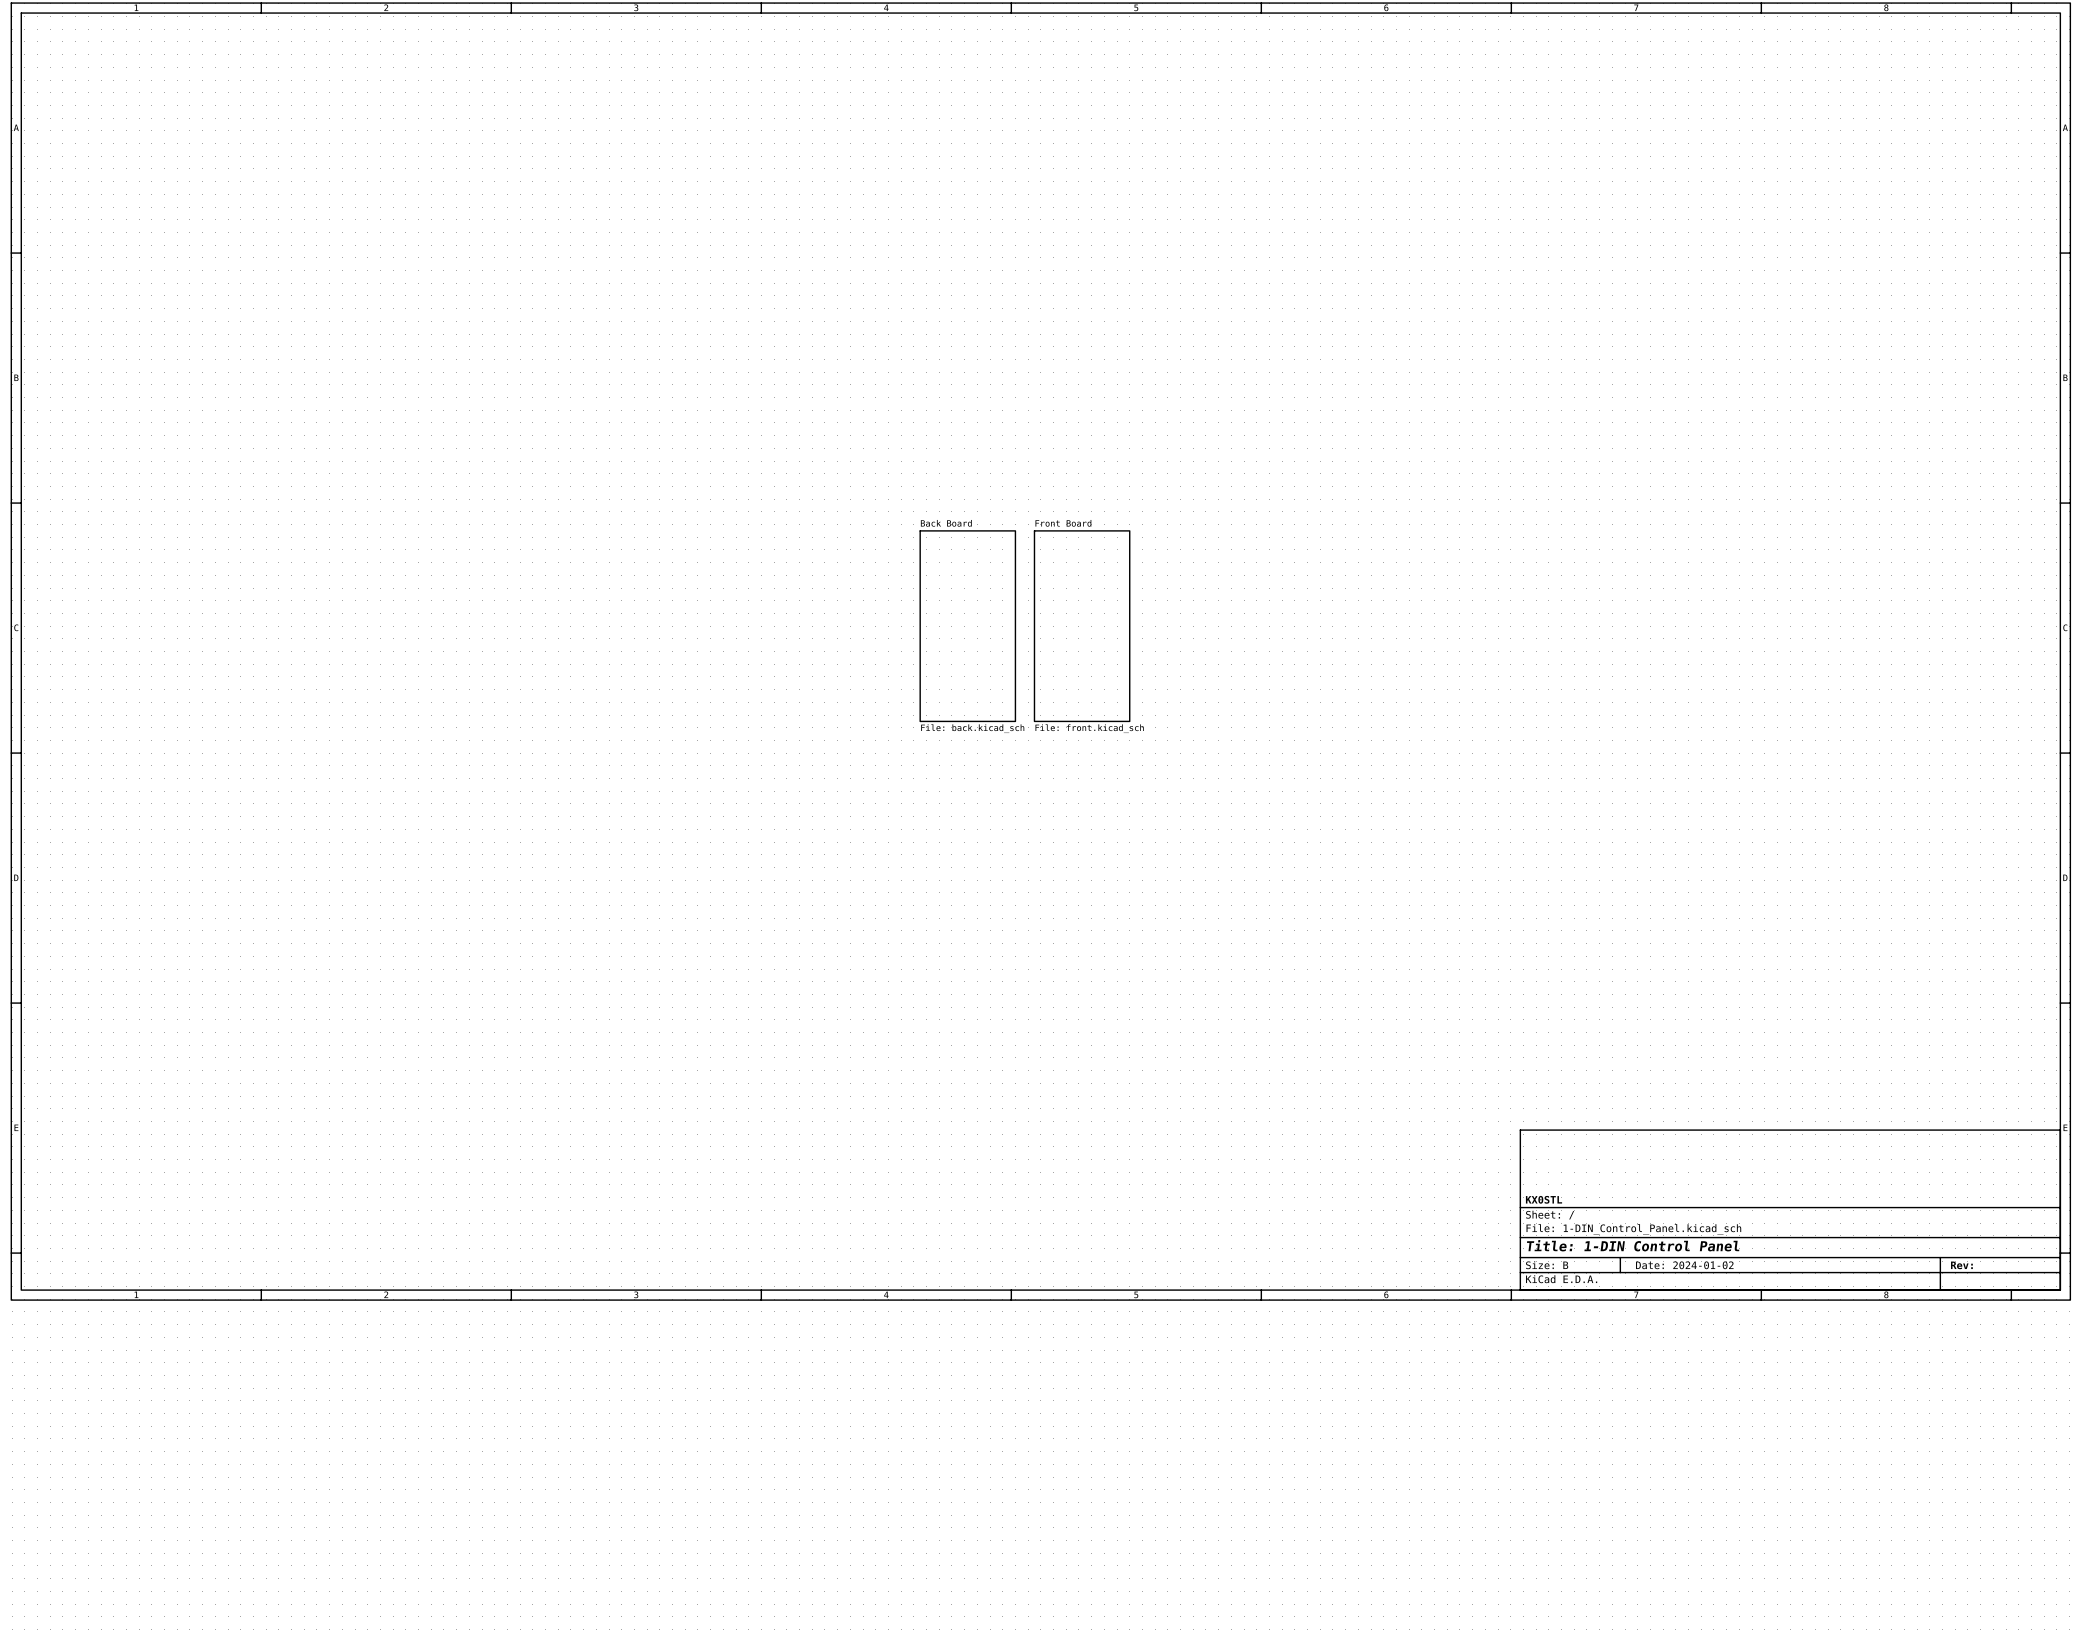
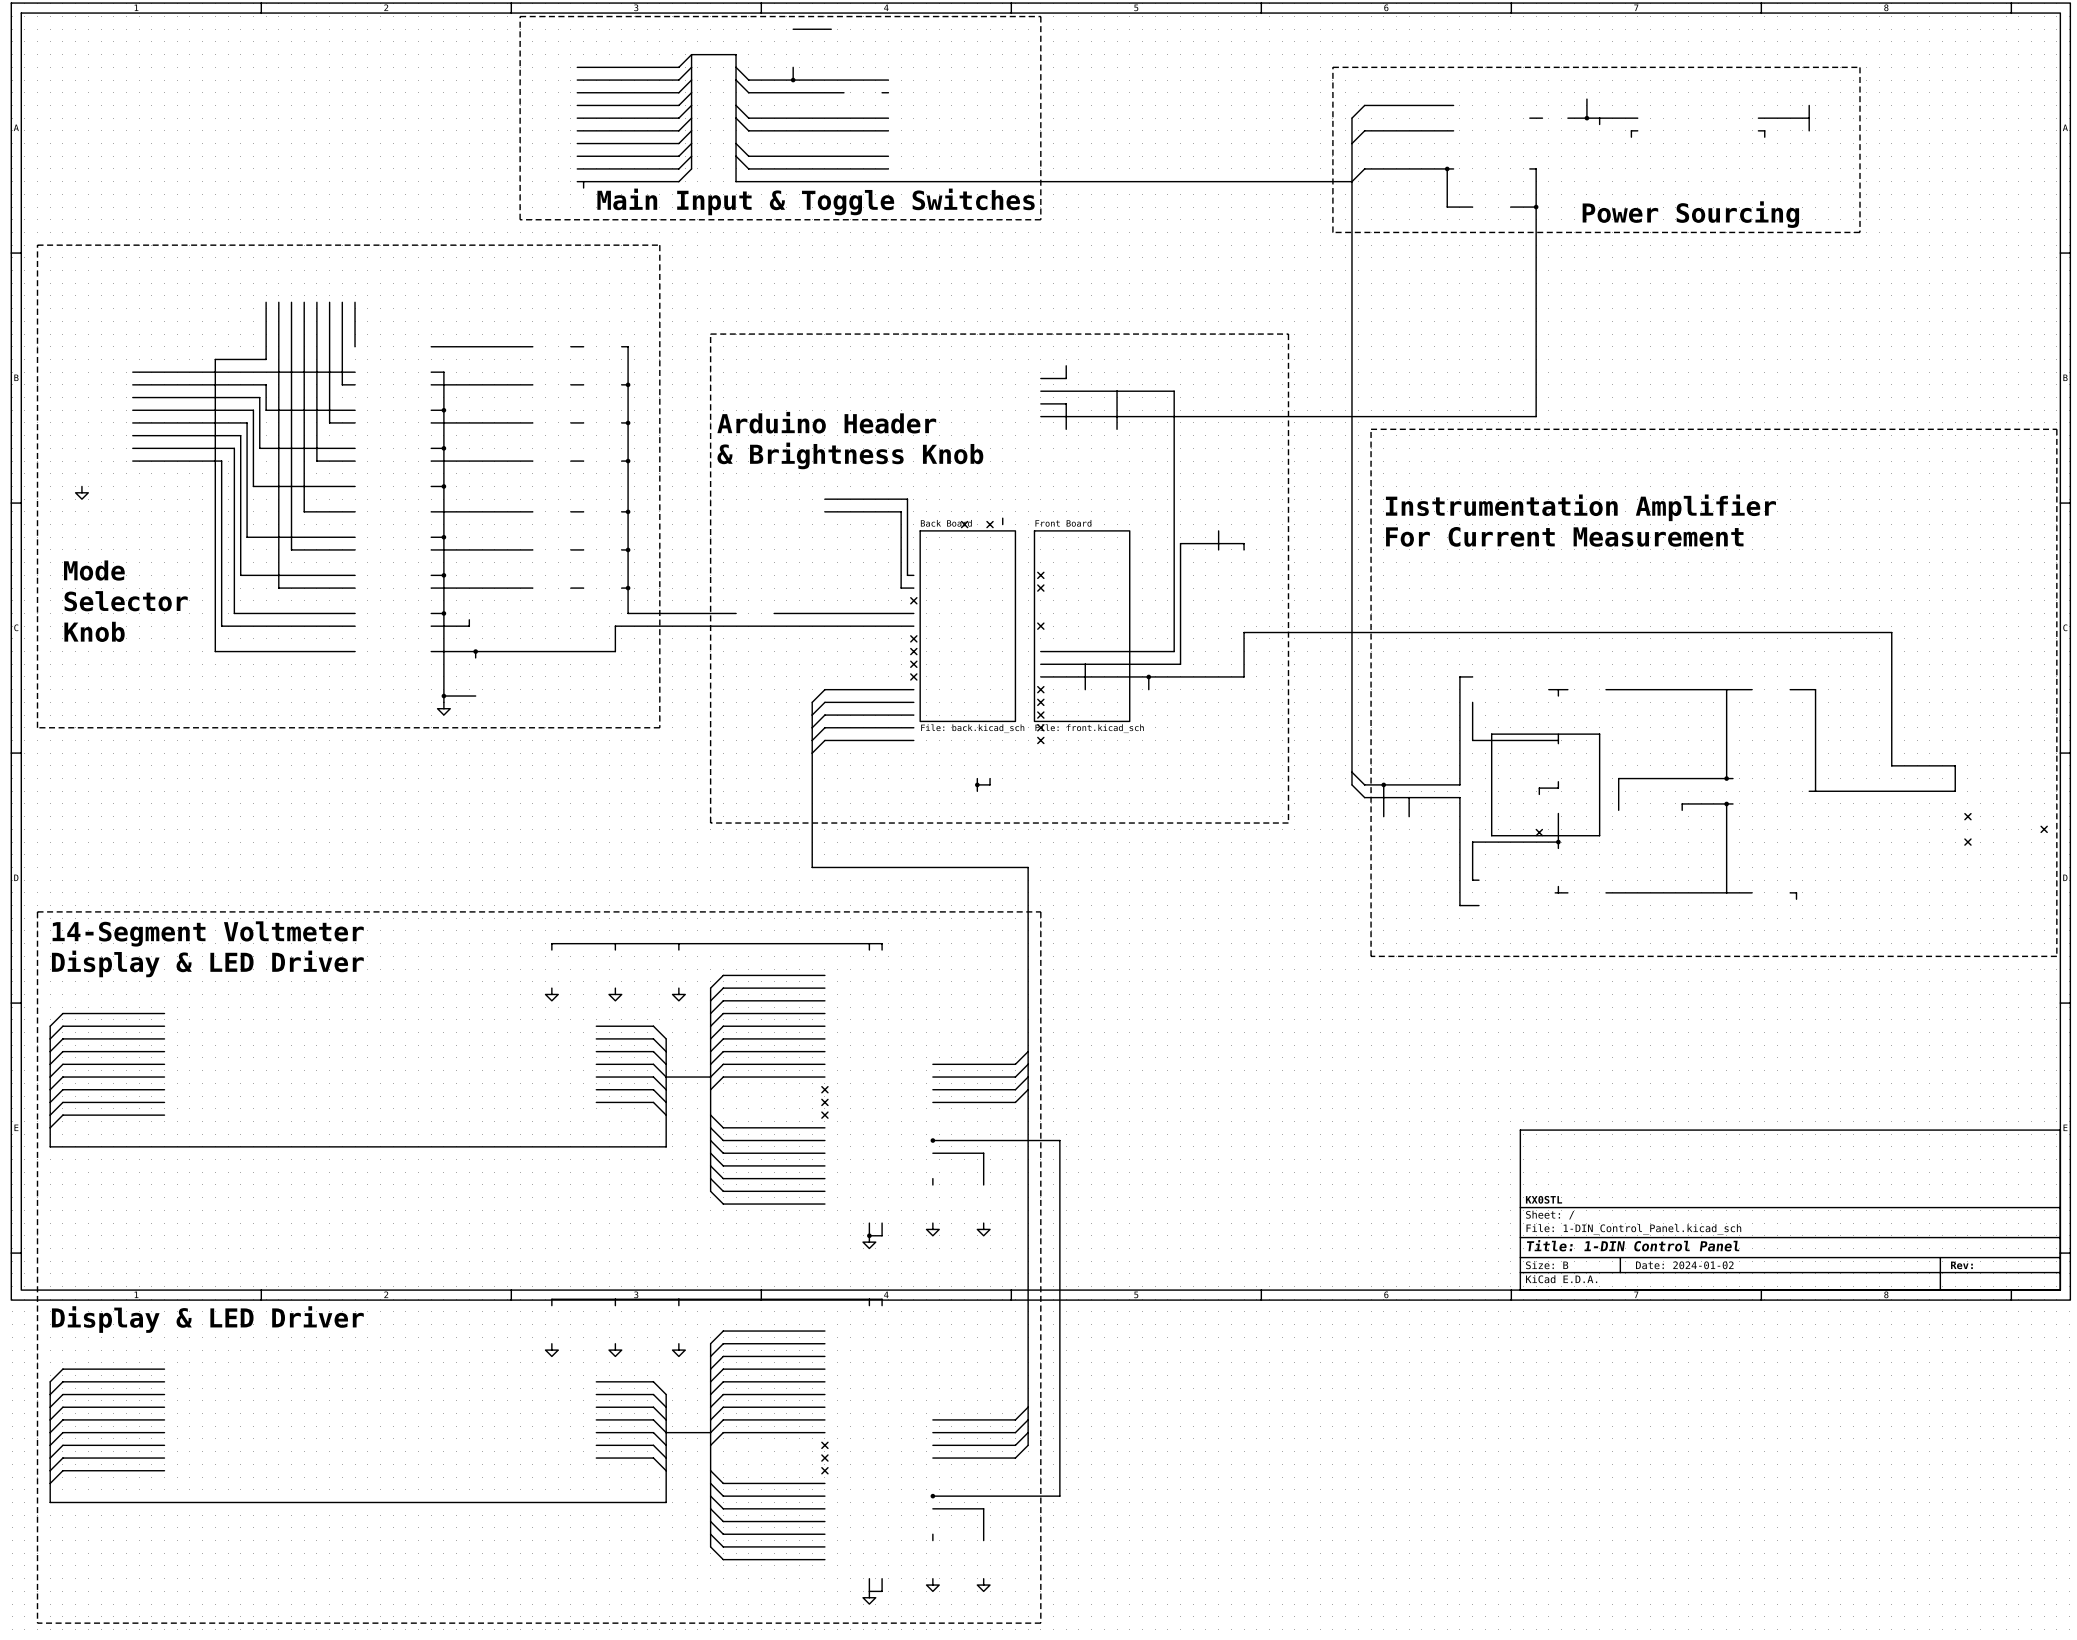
line: none -> (520, 16) (1040, 16) (1040, 219) (520, 219) (520, 16)
wire: none -> (793, 29) (831, 29)
wire: none -> (691, 54) (678, 67) (577, 67)
wire: none -> (691, 67) (678, 80) (577, 80)
wire: none -> (736, 67) (748, 80) (888, 80)
wire: none -> (793, 67) (793, 80)
line: none -> (1332, 67) (1860, 67) (1860, 232) (1332, 232) (1332, 67)
wire: none -> (691, 80) (678, 92) (577, 92)
wire: none -> (736, 80) (748, 92) (843, 92)
junction: none -> (793, 80)
wire: none -> (691, 92) (678, 105) (577, 105)
wire: none -> (882, 92) (888, 92)
wire: none -> (1586, 99) (1586, 118)
wire: none -> (691, 105) (678, 118) (577, 118)
wire: none -> (736, 105) (748, 118) (888, 118)
wire: none -> (1453, 105) (1364, 105) (1351, 118)
wire: none -> (1809, 105) (1809, 130)
wire: none -> (691, 118) (678, 130) (577, 130)
wire: none -> (736, 118) (748, 130) (888, 130)
bus: none -> (1351, 118) (1351, 784)
wire: none -> (1529, 118) (1542, 118)
wire: none -> (1567, 118) (1637, 118)
junction: none -> (1586, 118)
wire: none -> (1599, 118) (1599, 124)
wire: none -> (1758, 118) (1809, 118)
wire: none -> (691, 130) (678, 143) (577, 143)
wire: none -> (1453, 130) (1364, 130) (1351, 143)
wire: none -> (1637, 130) (1631, 130) (1631, 137)
wire: none -> (1758, 130) (1764, 130) (1764, 137)
wire: none -> (691, 143) (678, 156) (577, 156)
wire: none -> (736, 143) (748, 156) (888, 156)
wire: none -> (691, 156) (678, 168) (577, 168)
wire: none -> (736, 156) (748, 168) (888, 168)
wire: none -> (691, 168) (678, 181) (577, 181)
bus: none -> (691, 168) (691, 54) (736, 54) (736, 181) (1351, 181)
wire: none -> (1447, 168) (1447, 207) (1472, 207)
junction: none -> (1447, 168)
wire: none -> (1453, 168) (1364, 168) (1351, 181)
wire: none -> (1529, 168) (1536, 168) (1536, 416) (1040, 416)
wire: none -> (583, 181) (583, 188)
text: none -> Main Input & Toggle Switches (816, 201)
wire: none -> (1510, 207) (1536, 207)
junction: none -> (1536, 207)
text: none -> Power Sourcing (1690, 214)
line: none -> (37, 245) (659, 245) (659, 727) (37, 727) (37, 245)
wire: none -> (266, 302) (266, 359) (215, 359) (215, 651) (355, 651)
wire: none -> (278, 302) (278, 588) (355, 588)
wire: none -> (291, 302) (291, 549) (355, 549)
wire: none -> (304, 302) (304, 511) (355, 511)
wire: none -> (316, 302) (316, 461) (355, 461)
wire: none -> (329, 302) (329, 422) (355, 422)
wire: none -> (342, 302) (342, 384) (355, 384)
wire: none -> (355, 302) (355, 346)
line: none -> (710, 334) (1288, 334) (1288, 823) (710, 823) (710, 334)
wire: none -> (431, 346) (532, 346)
wire: none -> (570, 346) (583, 346)
wire: none -> (621, 346) (628, 346) (628, 613) (736, 613)
wire: none -> (1066, 365) (1066, 378) (1040, 378)
wire: none -> (132, 372) (355, 372)
wire: none -> (431, 372) (443, 372) (443, 702)
wire: none -> (132, 384) (266, 384) (266, 410) (355, 410)
wire: none -> (431, 384) (532, 384)
wire: none -> (570, 384) (583, 384)
wire: none -> (621, 384) (628, 384)
junction: none -> (628, 384)
wire: none -> (1040, 391) (1174, 391) (1174, 651) (1040, 651)
wire: none -> (1117, 391) (1117, 429)
wire: none -> (132, 397) (259, 397) (259, 448) (355, 448)
wire: none -> (1040, 403) (1066, 403) (1066, 429)
wire: none -> (132, 410) (253, 410) (253, 486) (355, 486)
wire: none -> (431, 410) (443, 410)
junction: none -> (443, 410)
wire: none -> (132, 422) (247, 422) (247, 537) (355, 537)
wire: none -> (431, 422) (532, 422)
wire: none -> (570, 422) (583, 422)
wire: none -> (621, 422) (628, 422)
junction: none -> (628, 422)
text: none -> Arduino Header (826, 422)
line: none -> (1371, 429) (2056, 429) (2056, 956) (1371, 956) (1371, 429)
wire: none -> (132, 435) (240, 435) (240, 575) (355, 575)
wire: none -> (132, 448) (234, 448) (234, 613) (355, 613)
wire: none -> (431, 448) (443, 448)
junction: none -> (443, 448)
text: none -> & Brightness Knob (850, 455)
wire: none -> (132, 461) (221, 461) (221, 626) (355, 626)
wire: none -> (431, 461) (532, 461)
wire: none -> (570, 461) (583, 461)
wire: none -> (621, 461) (628, 461)
junction: none -> (628, 461)
wire: none -> (431, 486) (443, 486)
junction: none -> (443, 486)
power symbol: none -> (81, 492)
wire: none -> (824, 499) (907, 499) (907, 575) (913, 575)
text: none -> Instrumentation Amplifier (1580, 507)
wire: none -> (431, 511) (532, 511)
wire: none -> (570, 511) (583, 511)
wire: none -> (621, 511) (628, 511)
junction: none -> (628, 511)
wire: none -> (824, 511) (901, 511) (901, 588) (913, 588)
wire: none -> (1002, 518) (1002, 524)
no-connect mark: none -> (964, 524)
no-connect mark: none -> (990, 524)
wire: none -> (1218, 530) (1218, 549)
text: none -> For Current Measurement (1564, 536)
wire: none -> (431, 537) (443, 537)
junction: none -> (443, 537)
wire: none -> (431, 549) (532, 549)
wire: none -> (570, 549) (583, 549)
wire: none -> (621, 549) (628, 549)
junction: none -> (628, 549)
wire: none -> (1244, 549) (1244, 543) (1180, 543) (1180, 664) (1040, 664)
text: none -> Mode (94, 570)
wire: none -> (431, 575) (443, 575)
junction: none -> (443, 575)
no-connect mark: none -> (1040, 575)
wire: none -> (431, 588) (532, 588)
wire: none -> (570, 588) (583, 588)
wire: none -> (621, 588) (628, 588)
junction: none -> (628, 588)
no-connect mark: none -> (1040, 588)
no-connect mark: none -> (913, 600)
text: none -> Selector (126, 601)
wire: none -> (431, 613) (443, 613)
junction: none -> (443, 613)
wire: none -> (774, 613) (913, 613)
wire: none -> (469, 619) (469, 626) (431, 626)
wire: none -> (913, 626) (615, 626) (615, 651) (431, 651)
no-connect mark: none -> (1040, 626)
text: none -> Knob (94, 631)
no-connect mark: none -> (913, 638)
wire: none -> (475, 651) (475, 657)
junction: none -> (475, 651)
no-connect mark: none -> (913, 651)
no-connect mark: none -> (913, 664)
wire: none -> (1085, 664) (1085, 689)
no-connect mark: none -> (913, 676)
wire: none -> (1040, 676) (1244, 676) (1244, 632) (1891, 632) (1891, 765) (1955, 765) (1955, 791) (1809, 791)
wire: none -> (1148, 676) (1148, 689)
junction: none -> (1148, 676)
wire: none -> (1472, 676) (1459, 676) (1459, 784) (1364, 784) (1351, 772)
wire: none -> (913, 689) (824, 689) (812, 702)
no-connect mark: none -> (1040, 689)
wire: none -> (1548, 689) (1567, 689)
wire: none -> (1558, 689) (1558, 696)
wire: none -> (1605, 689) (1752, 689)
wire: none -> (1726, 689) (1726, 778)
wire: none -> (1790, 689) (1815, 689) (1815, 791)
wire: none -> (443, 696) (475, 696)
junction: none -> (443, 696)
bus: none -> (812, 702) (812, 867) (1028, 867) (1028, 1445)
wire: none -> (913, 702) (824, 702) (812, 715)
no-connect mark: none -> (1040, 702)
wire: none -> (1472, 702) (1472, 740) (1558, 740)
power symbol: none -> (443, 708)
wire: none -> (913, 715) (824, 715) (812, 727)
no-connect mark: none -> (1040, 715)
wire: none -> (913, 727) (824, 727) (812, 740)
no-connect mark: none -> (1040, 727)
line: none -> (1491, 734) (1599, 734) (1599, 835) (1491, 835) (1491, 734)
wire: none -> (1558, 734) (1558, 743)
wire: none -> (913, 740) (824, 740) (812, 753)
no-connect mark: none -> (1040, 740)
wire: none -> (977, 778) (977, 791)
wire: none -> (990, 778) (990, 784) (977, 784)
junction: none -> (1726, 778)
wire: none -> (1732, 778) (1618, 778) (1618, 810)
wire: none -> (1558, 781) (1558, 788) (1539, 788) (1539, 794)
junction: none -> (977, 784)
wire: none -> (1351, 784) (1364, 797) (1459, 797) (1459, 905) (1478, 905)
wire: none -> (1383, 784) (1383, 816)
junction: none -> (1383, 784)
wire: none -> (1409, 797) (1409, 816)
wire: none -> (1726, 803) (1726, 892)
junction: none -> (1726, 803)
wire: none -> (1732, 803) (1682, 803) (1682, 810)
wire: none -> (1558, 813) (1558, 848)
no-connect mark: none -> (1967, 816)
no-connect mark: none -> (2044, 829)
no-connect mark: none -> (1539, 832)
wire: none -> (1558, 842) (1472, 842) (1472, 880) (1478, 880)
junction: none -> (1558, 842)
no-connect mark: none -> (1967, 842)
wire: none -> (1558, 886) (1558, 892)
wire: none -> (1555, 892) (1567, 892)
wire: none -> (1605, 892) (1752, 892)
wire: none -> (1790, 892) (1796, 892) (1796, 899)
line: none -> (37, 911) (37, 1623) (1040, 1623) (1040, 911) (37, 911)
text: none -> 14-Segment Voltmeter (208, 933)
wire: none -> (615, 943) (615, 950)
wire: none -> (678, 943) (678, 950)
wire: none -> (869, 943) (869, 950)
wire: none -> (551, 950) (551, 943) (882, 943) (882, 950)
text: none -> Display & LED Driver (207, 963)
wire: none -> (824, 975) (723, 975) (710, 988)
bus: none -> (710, 988) (710, 1191)
wire: none -> (824, 988) (723, 988) (710, 1000)
power symbol: none -> (551, 994)
power symbol: none -> (615, 994)
power symbol: none -> (678, 994)
wire: none -> (824, 1000) (723, 1000) (710, 1013)
wire: none -> (164, 1013) (62, 1013) (50, 1026)
wire: none -> (824, 1013) (723, 1013) (710, 1026)
bus: none -> (50, 1026) (50, 1146) (666, 1146) (666, 1038)
wire: none -> (164, 1026) (62, 1026) (50, 1038)
wire: none -> (596, 1026) (653, 1026) (666, 1038)
wire: none -> (824, 1026) (723, 1026) (710, 1038)
wire: none -> (164, 1038) (62, 1038) (50, 1051)
wire: none -> (596, 1038) (653, 1038) (666, 1051)
wire: none -> (824, 1038) (723, 1038) (710, 1051)
wire: none -> (164, 1051) (62, 1051) (50, 1064)
wire: none -> (596, 1051) (653, 1051) (666, 1064)
wire: none -> (824, 1051) (723, 1051) (710, 1064)
wire: none -> (1028, 1051) (1015, 1064) (932, 1064)
wire: none -> (164, 1064) (62, 1064) (50, 1077)
wire: none -> (596, 1064) (653, 1064) (666, 1077)
wire: none -> (824, 1064) (723, 1064) (710, 1077)
wire: none -> (1028, 1064) (1015, 1077) (932, 1077)
wire: none -> (164, 1077) (62, 1077) (50, 1089)
wire: none -> (596, 1077) (653, 1077) (666, 1089)
bus: none -> (666, 1077) (710, 1077)
wire: none -> (824, 1077) (723, 1077) (710, 1089)
wire: none -> (1028, 1077) (1015, 1089) (932, 1089)
wire: none -> (164, 1089) (62, 1089) (50, 1102)
wire: none -> (596, 1089) (653, 1089) (666, 1102)
no-connect mark: none -> (824, 1089)
wire: none -> (1028, 1089) (1015, 1102) (932, 1102)
wire: none -> (164, 1102) (62, 1102) (50, 1115)
wire: none -> (596, 1102) (653, 1102) (666, 1115)
no-connect mark: none -> (824, 1102)
wire: none -> (164, 1115) (62, 1115) (50, 1127)
wire: none -> (710, 1115) (723, 1127) (824, 1127)
no-connect mark: none -> (824, 1115)
wire: none -> (710, 1127) (723, 1140) (824, 1140)
wire: none -> (710, 1140) (723, 1153) (824, 1153)
wire: none -> (932, 1140) (1059, 1140) (1059, 1496) (932, 1496)
junction: none -> (932, 1140)
wire: none -> (710, 1153) (723, 1165) (824, 1165)
wire: none -> (932, 1153) (983, 1153) (983, 1184)
wire: none -> (710, 1165) (723, 1178) (824, 1178)
wire: none -> (710, 1178) (723, 1191) (824, 1191)
wire: none -> (932, 1178) (932, 1184)
wire: none -> (710, 1191) (723, 1204) (824, 1204)
wire: none -> (869, 1223) (869, 1235) (882, 1235) (882, 1223)
power symbol: none -> (932, 1229)
power symbol: none -> (983, 1229)
junction: none -> (869, 1235)
power symbol: none -> (869, 1242)
wire: none -> (615, 1299) (615, 1305)
wire: none -> (678, 1299) (678, 1305)
wire: none -> (869, 1299) (869, 1305)
wire: none -> (551, 1305) (551, 1299) (882, 1299) (882, 1305)
text: none -> Display & LED Driver (207, 1319)
wire: none -> (824, 1331) (723, 1331) (710, 1343)
bus: none -> (710, 1343) (710, 1546)
wire: none -> (824, 1343) (723, 1343) (710, 1356)
power symbol: none -> (551, 1350)
power symbol: none -> (615, 1350)
power symbol: none -> (678, 1350)
wire: none -> (824, 1356) (723, 1356) (710, 1369)
wire: none -> (164, 1369) (62, 1369) (50, 1381)
wire: none -> (824, 1369) (723, 1369) (710, 1381)
bus: none -> (50, 1381) (50, 1502) (666, 1502) (666, 1394)
wire: none -> (164, 1381) (62, 1381) (50, 1394)
wire: none -> (596, 1381) (653, 1381) (666, 1394)
wire: none -> (824, 1381) (723, 1381) (710, 1394)
wire: none -> (164, 1394) (62, 1394) (50, 1407)
wire: none -> (596, 1394) (653, 1394) (666, 1407)
wire: none -> (824, 1394) (723, 1394) (710, 1407)
wire: none -> (164, 1407) (62, 1407) (50, 1419)
wire: none -> (596, 1407) (653, 1407) (666, 1419)
wire: none -> (824, 1407) (723, 1407) (710, 1419)
wire: none -> (1028, 1407) (1015, 1419) (932, 1419)
wire: none -> (164, 1419) (62, 1419) (50, 1432)
wire: none -> (596, 1419) (653, 1419) (666, 1432)
wire: none -> (824, 1419) (723, 1419) (710, 1432)
wire: none -> (1028, 1419) (1015, 1432) (932, 1432)
wire: none -> (164, 1432) (62, 1432) (50, 1445)
wire: none -> (596, 1432) (653, 1432) (666, 1445)
bus: none -> (666, 1432) (710, 1432)
wire: none -> (824, 1432) (723, 1432) (710, 1445)
wire: none -> (1028, 1432) (1015, 1445) (932, 1445)
wire: none -> (164, 1445) (62, 1445) (50, 1458)
wire: none -> (596, 1445) (653, 1445) (666, 1458)
no-connect mark: none -> (824, 1445)
wire: none -> (1028, 1445) (1015, 1458) (932, 1458)
wire: none -> (164, 1458) (62, 1458) (50, 1470)
wire: none -> (596, 1458) (653, 1458) (666, 1470)
no-connect mark: none -> (824, 1458)
wire: none -> (164, 1470) (62, 1470) (50, 1483)
wire: none -> (710, 1470) (723, 1483) (824, 1483)
no-connect mark: none -> (824, 1470)
wire: none -> (710, 1483) (723, 1496) (824, 1496)
wire: none -> (710, 1496) (723, 1508) (824, 1508)
junction: none -> (932, 1496)
wire: none -> (710, 1508) (723, 1521) (824, 1521)
wire: none -> (932, 1508) (983, 1508) (983, 1540)
wire: none -> (710, 1521) (723, 1534) (824, 1534)
wire: none -> (710, 1534) (723, 1546) (824, 1546)
wire: none -> (932, 1534) (932, 1540)
wire: none -> (710, 1546) (723, 1559) (824, 1559)
wire: none -> (869, 1578) (869, 1591) (882, 1591) (882, 1578)
power symbol: none -> (932, 1585)
power symbol: none -> (983, 1585)
power symbol: none -> (869, 1597)

